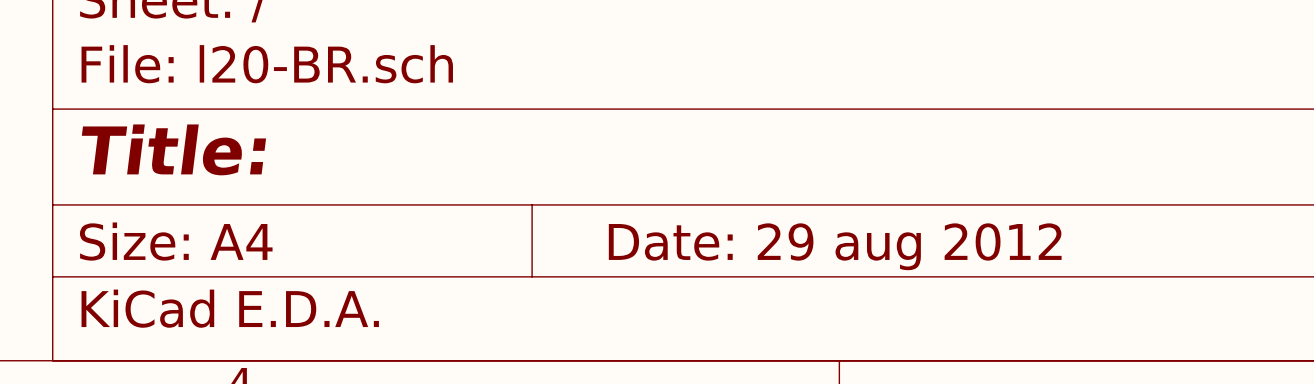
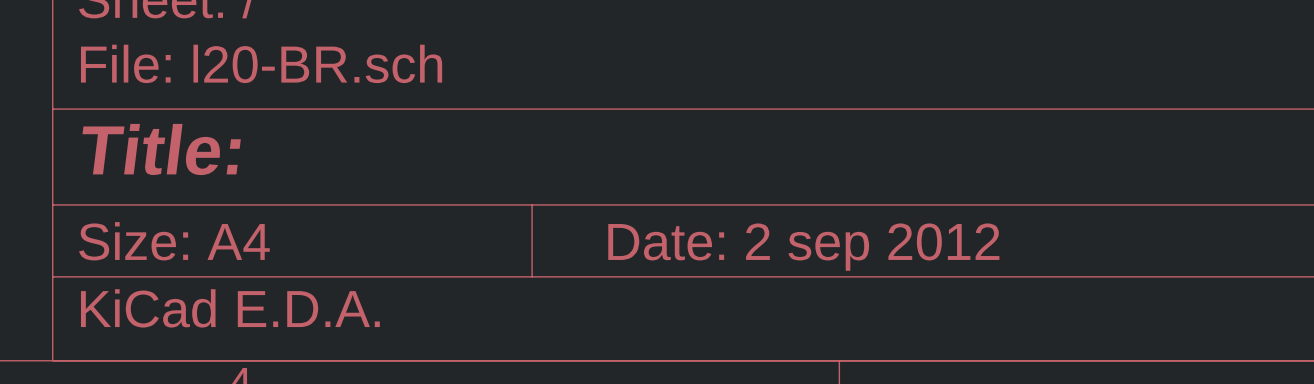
title block: Date: 29 aug 2012 (835, 246) -> Date: 2 sep 2012 (803, 247)

